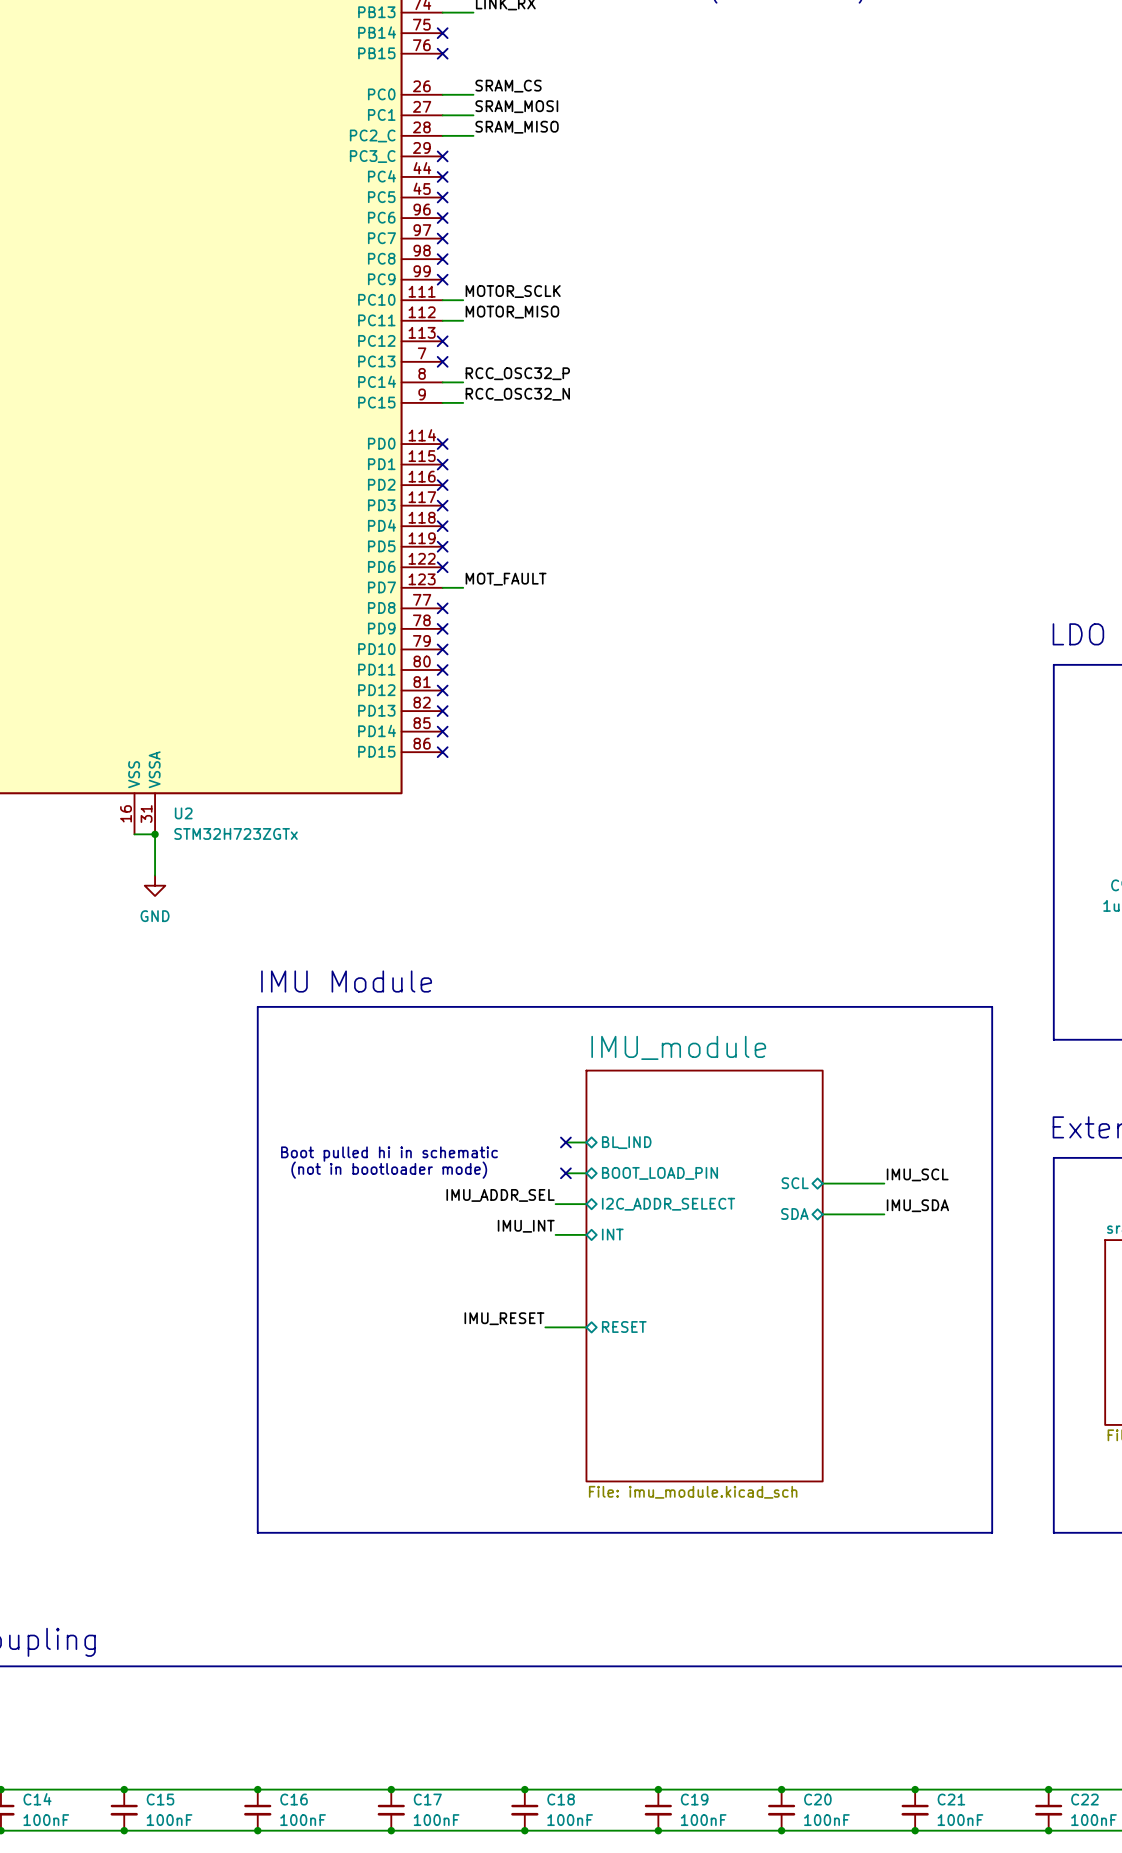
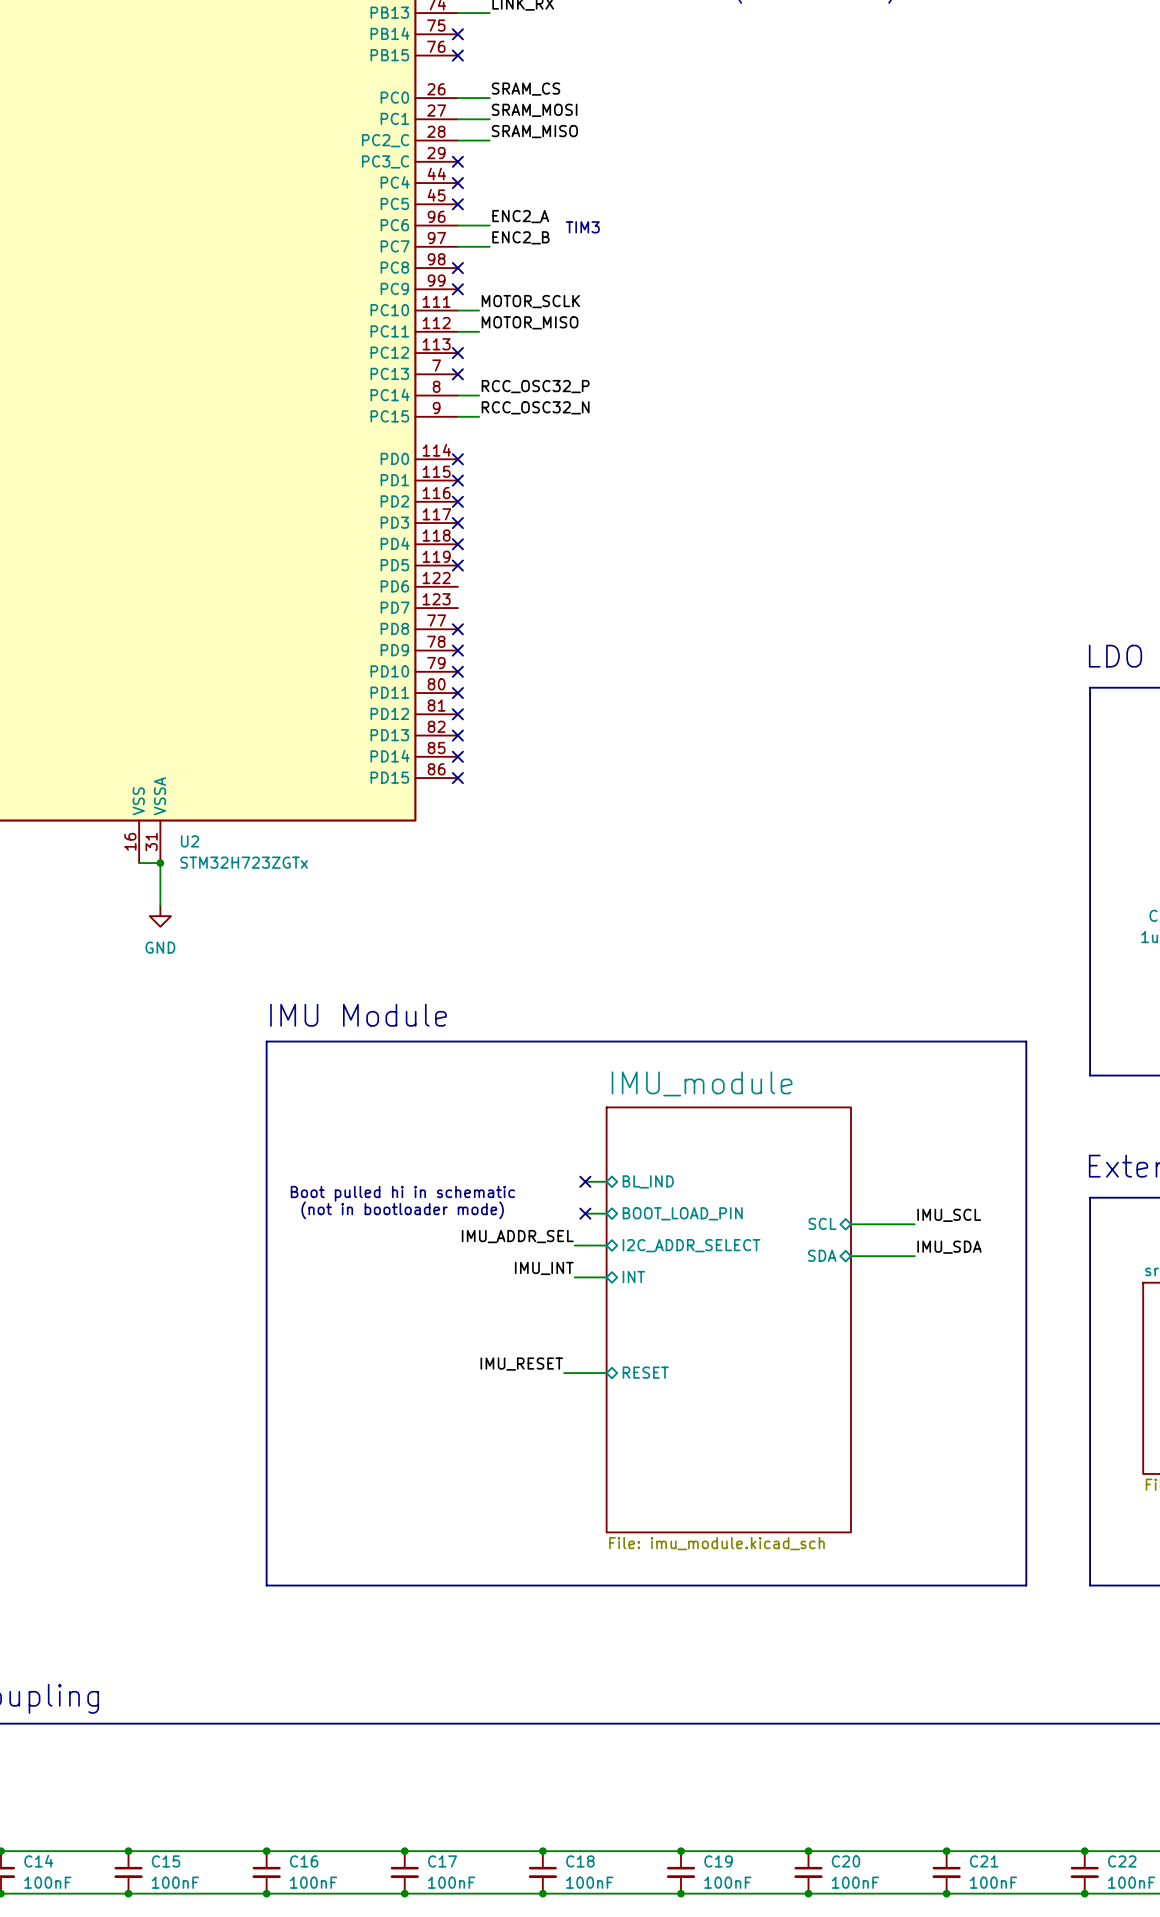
label: none -> ENC2_A (520, 216)
wire: none -> (457, 225) (489, 225)
no-connect mark: (442, 218) -> none
text: none -> TIM3 (582, 227)
label: none -> ENC2_B (520, 237)
wire: none -> (457, 246) (489, 246)
no-connect mark: (442, 238) -> none
no-connect mark: (442, 567) -> none
label: MOT_FAULT (506, 579) -> none
wire: (442, 587) (463, 587) -> none

